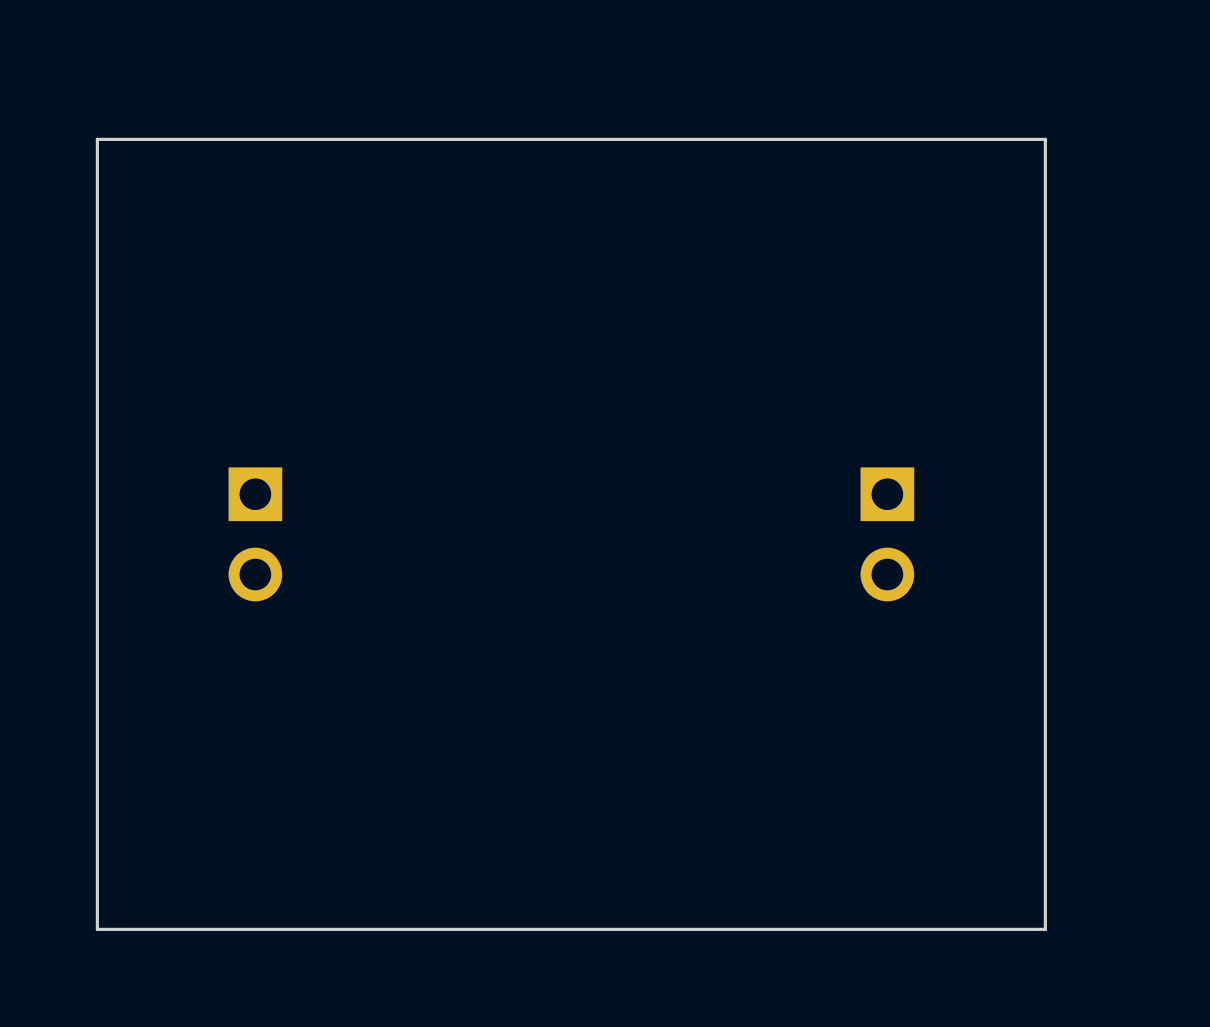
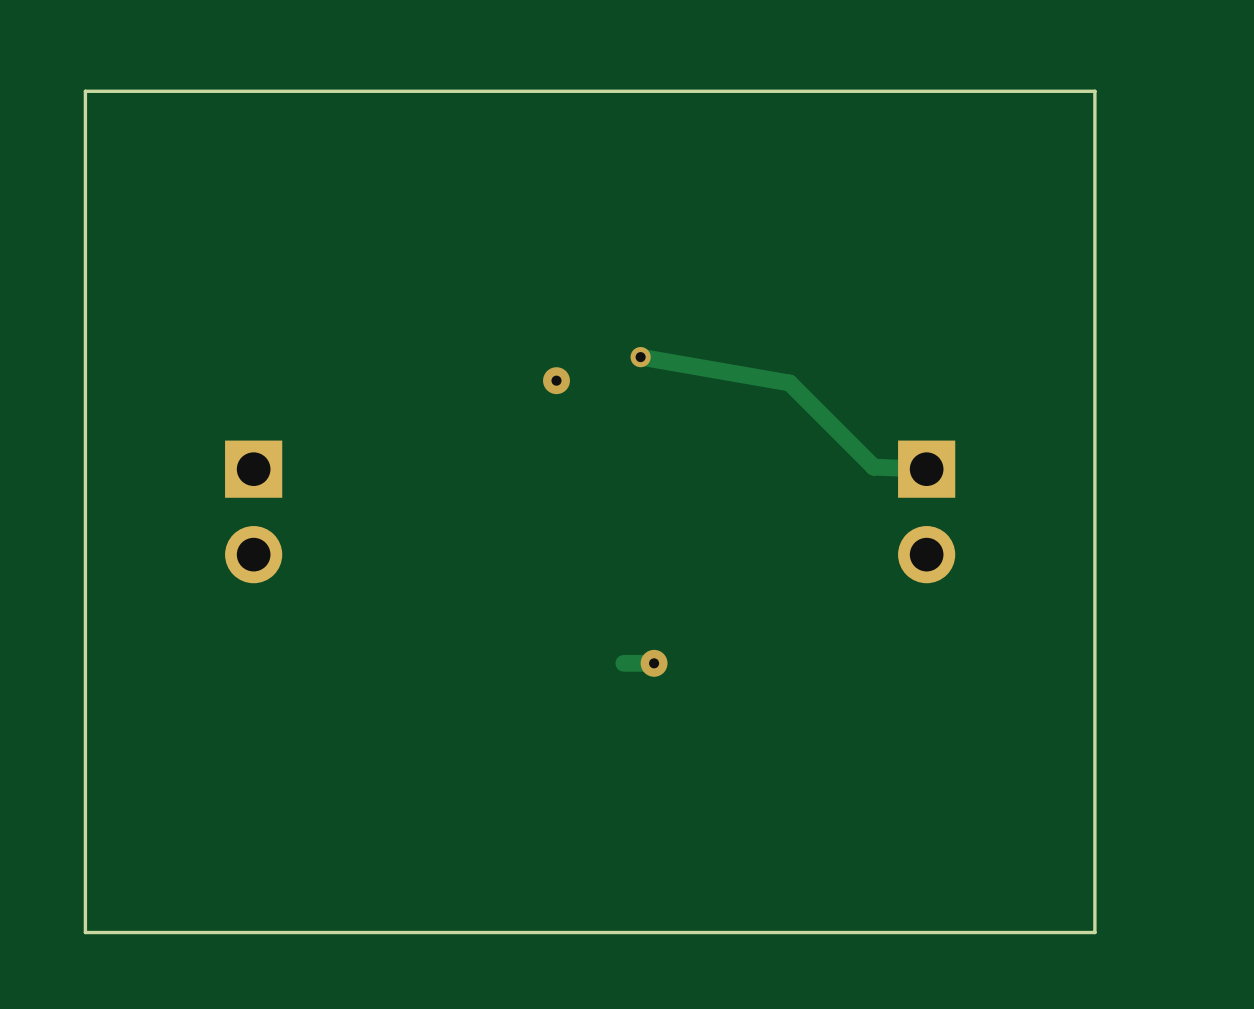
track: none -> (640, 357) (789, 383) (873, 467) (926, 469)
via: none -> (640, 357)
via: none -> (556, 380)
track: none -> (654, 663) (623, 663)
via: none -> (654, 663)

